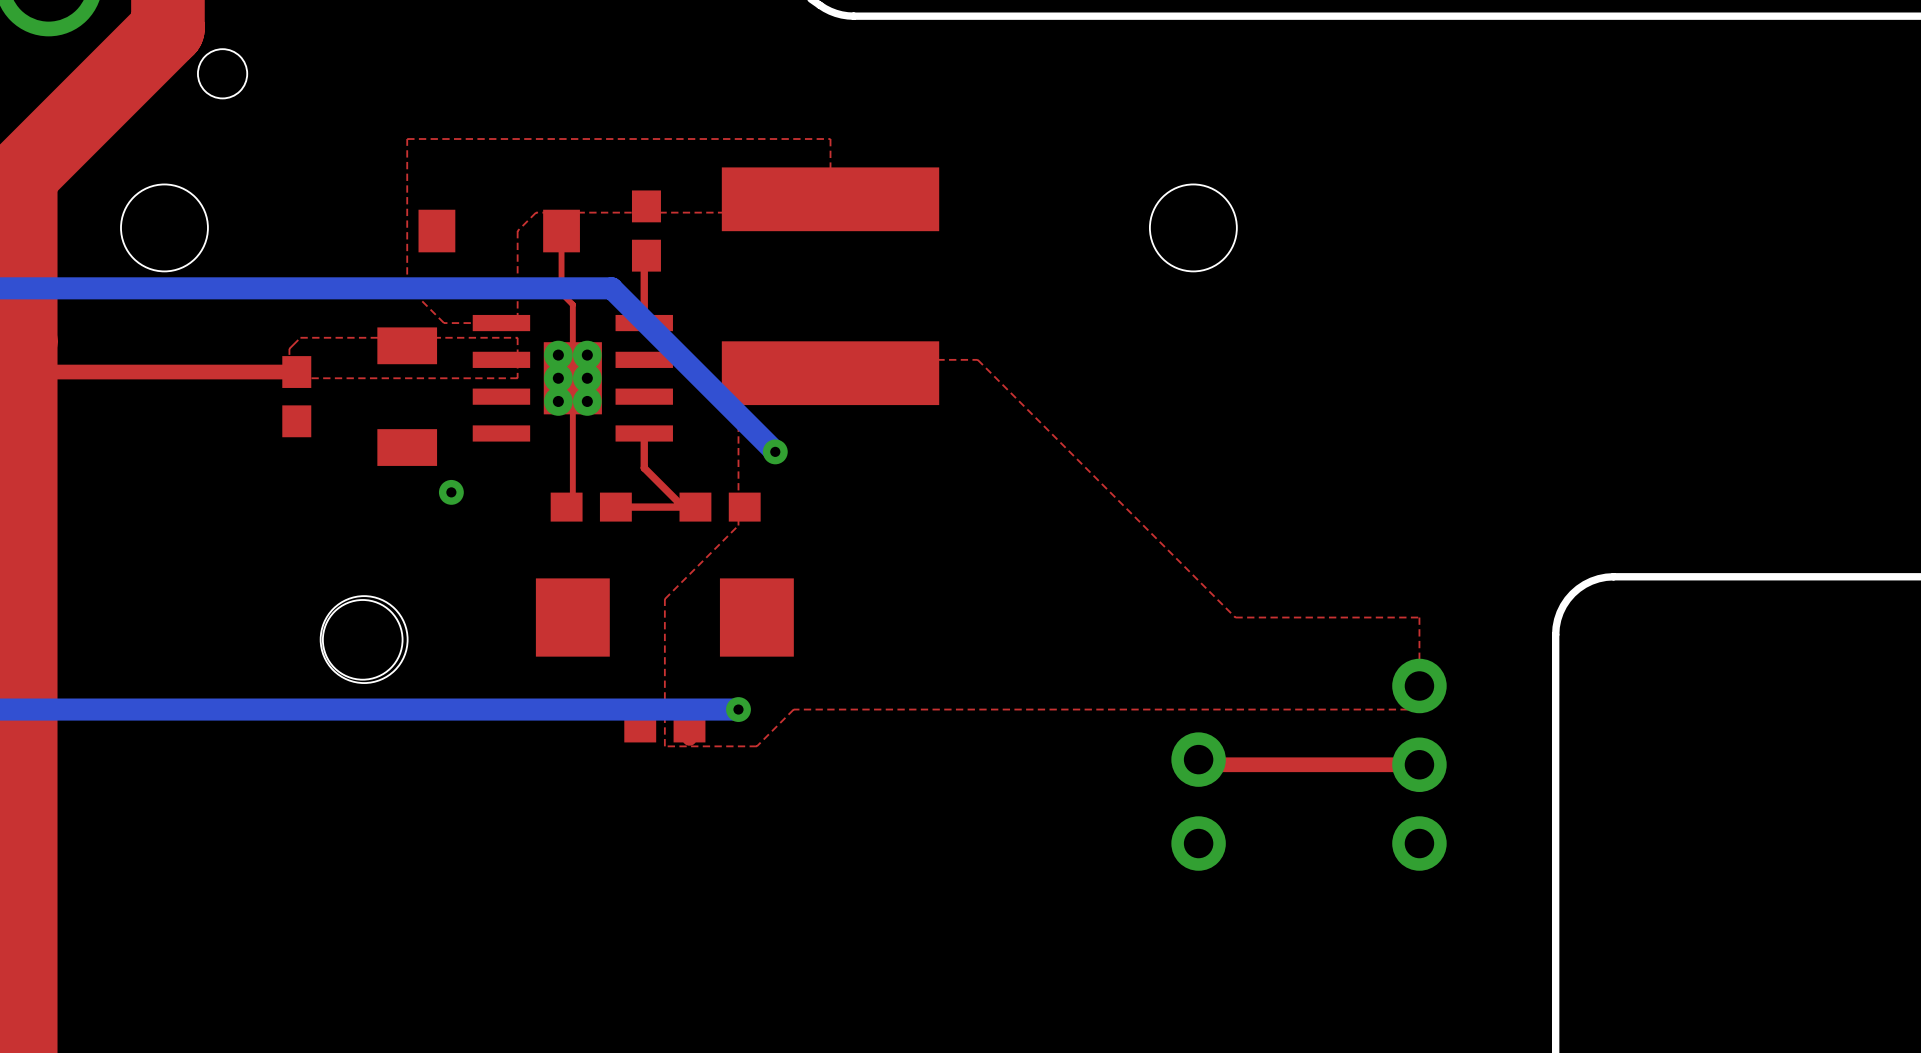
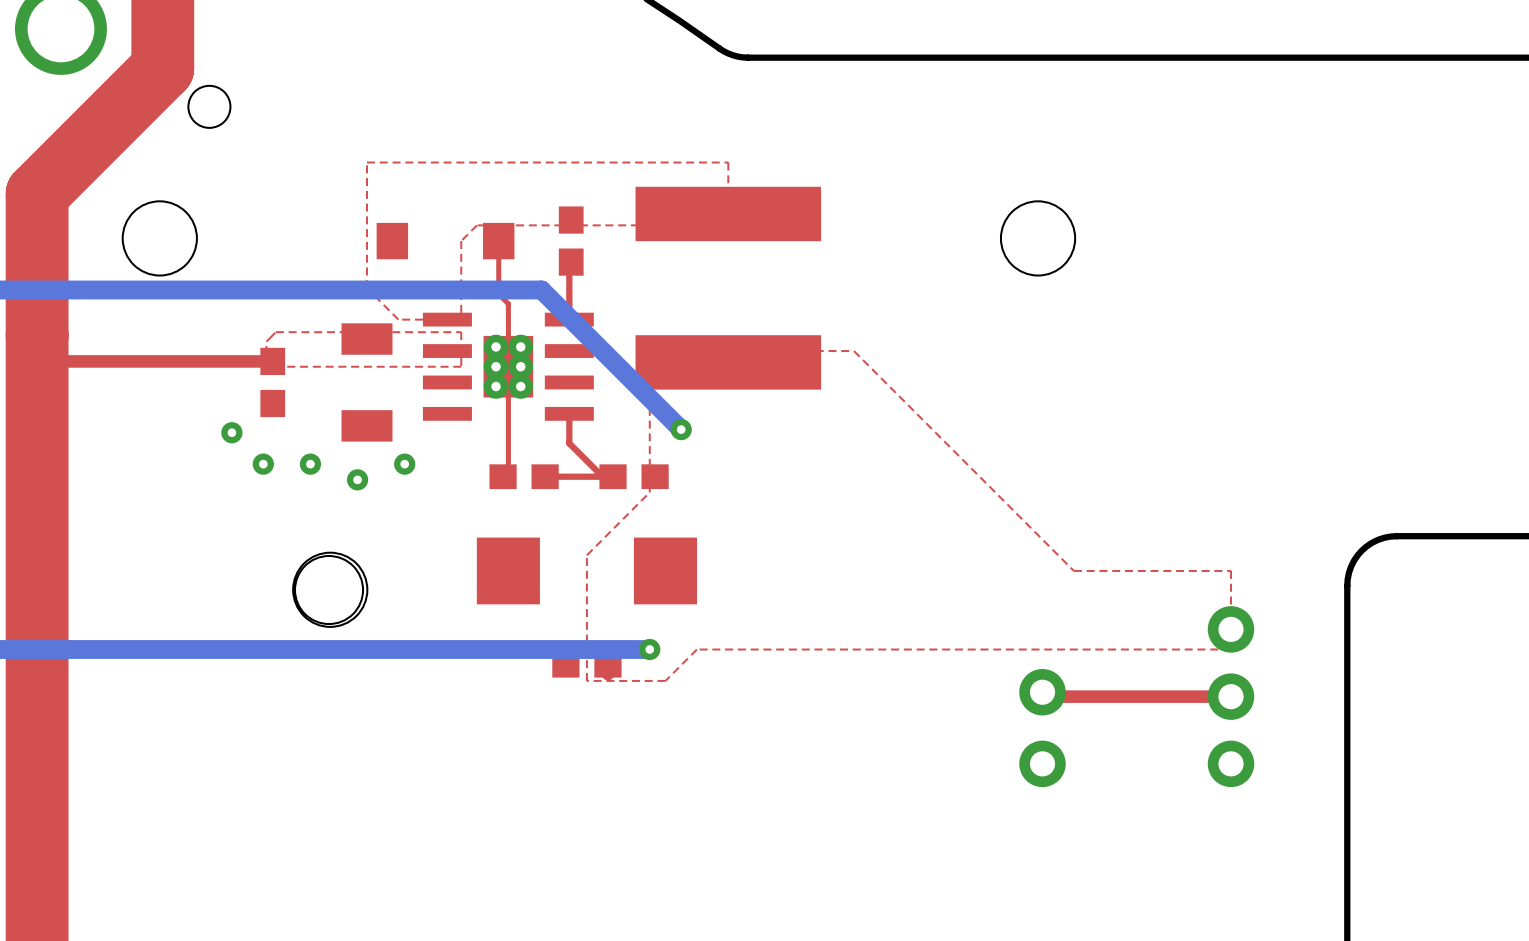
via: none -> (231, 432)
via: none -> (263, 464)
via: none -> (310, 464)
via: none -> (357, 479)

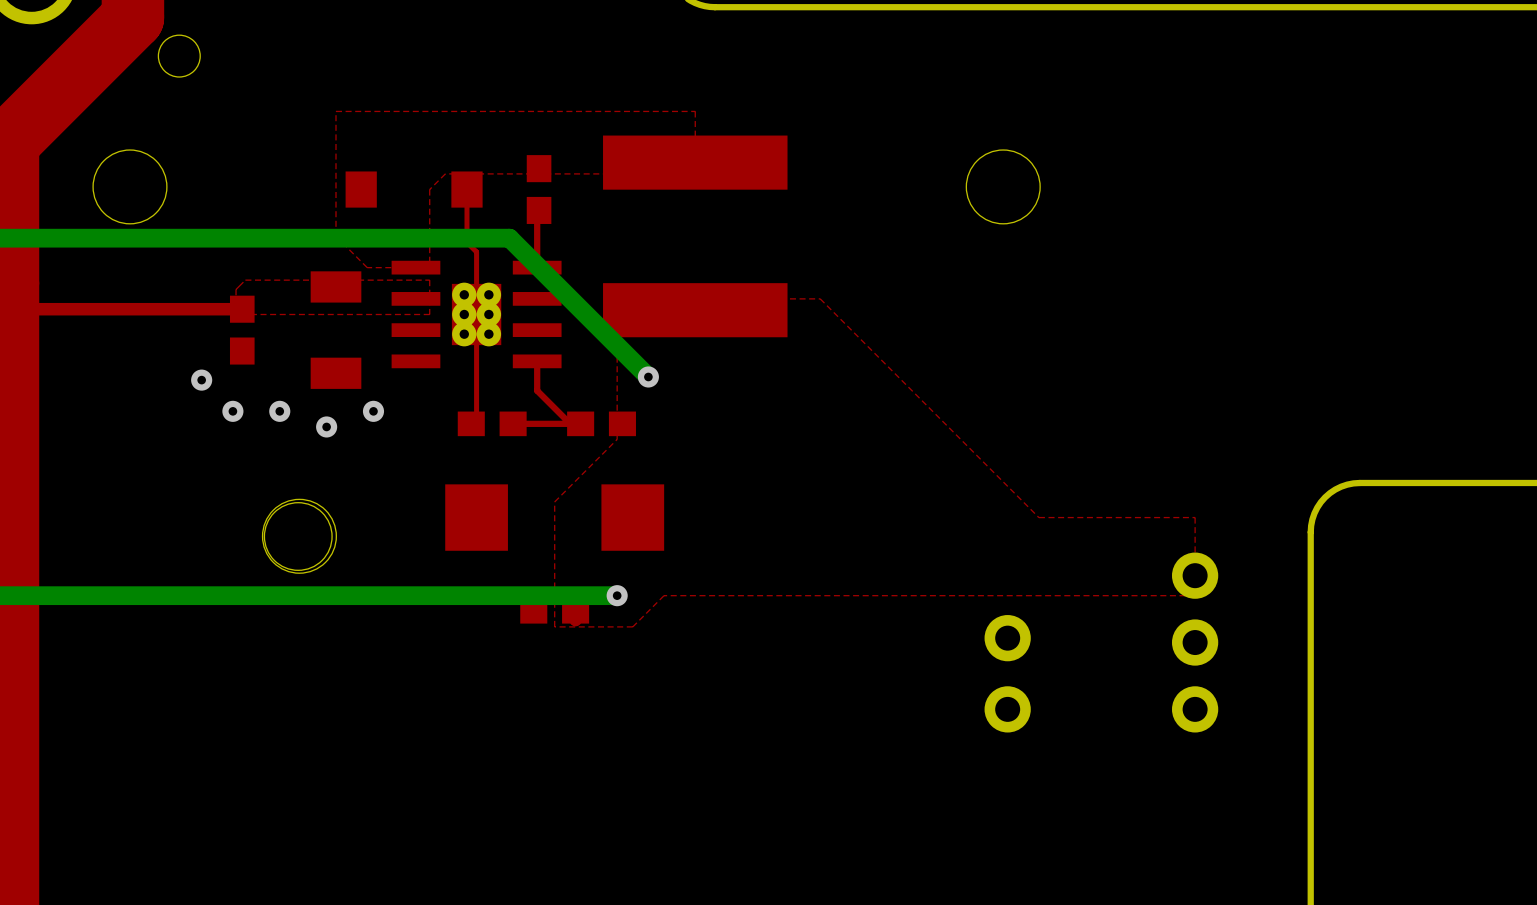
top track: (1231, 696) (1046, 696) -> none

